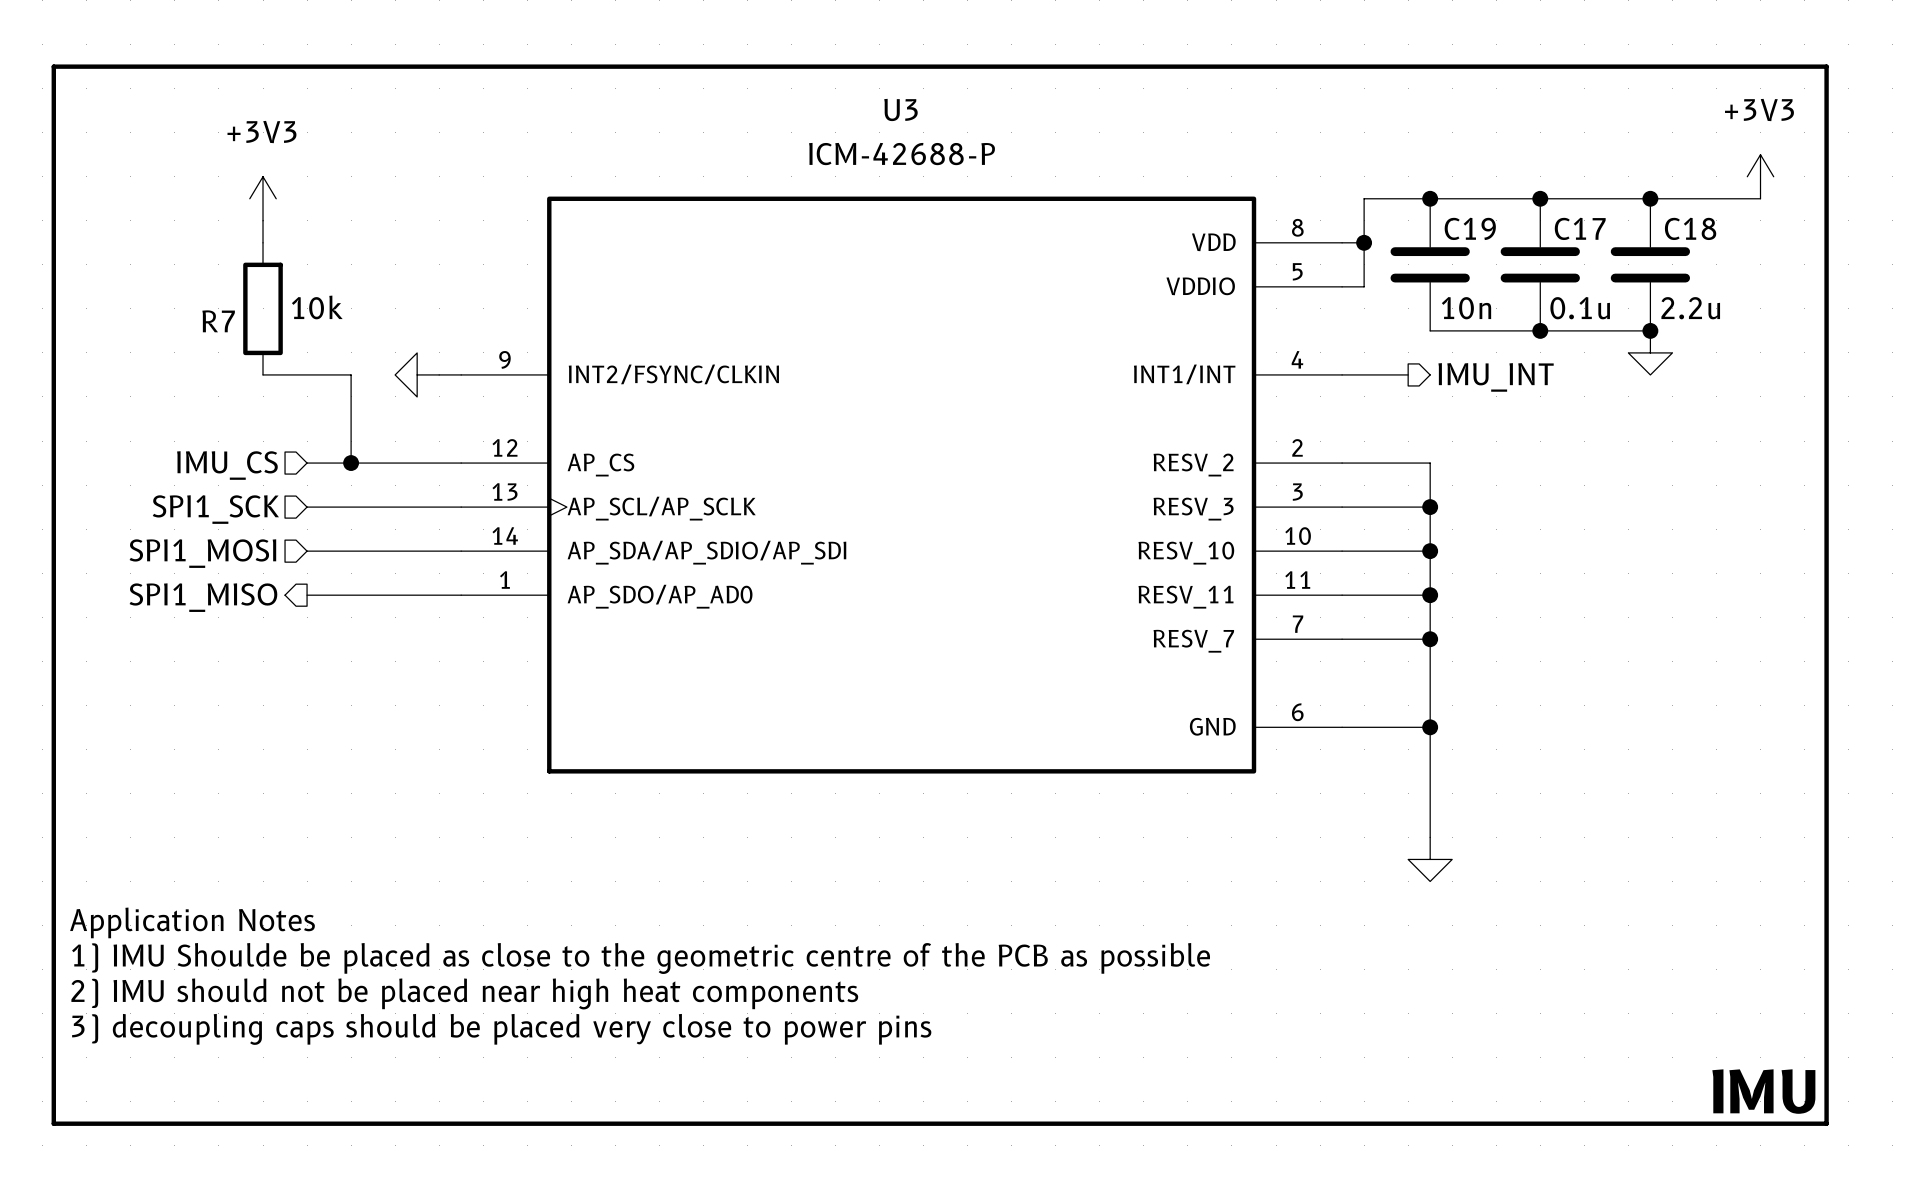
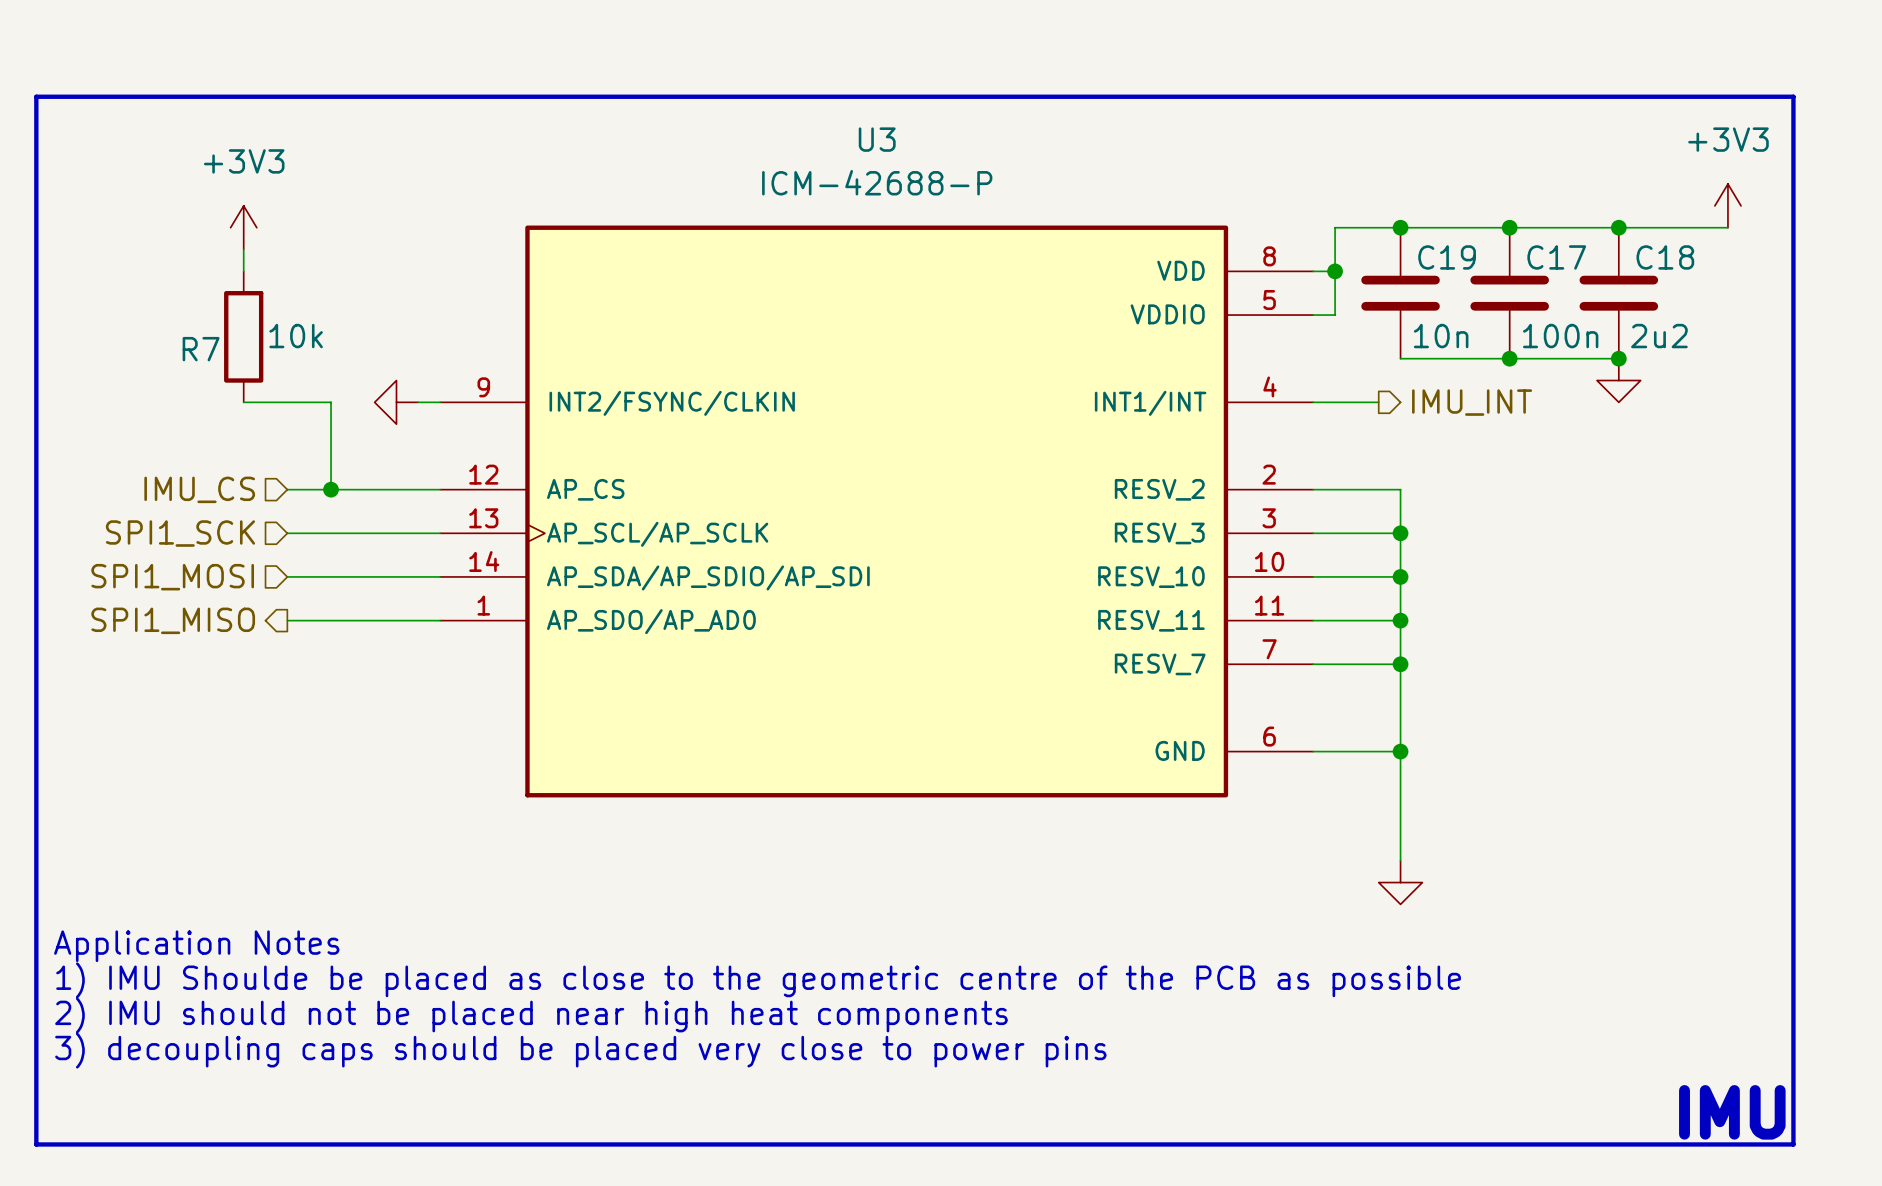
C17 value: 0.1u (1580, 308) -> 100n (1560, 336)
C18 value: 2.2u (1690, 308) -> 2u2 (1659, 336)

